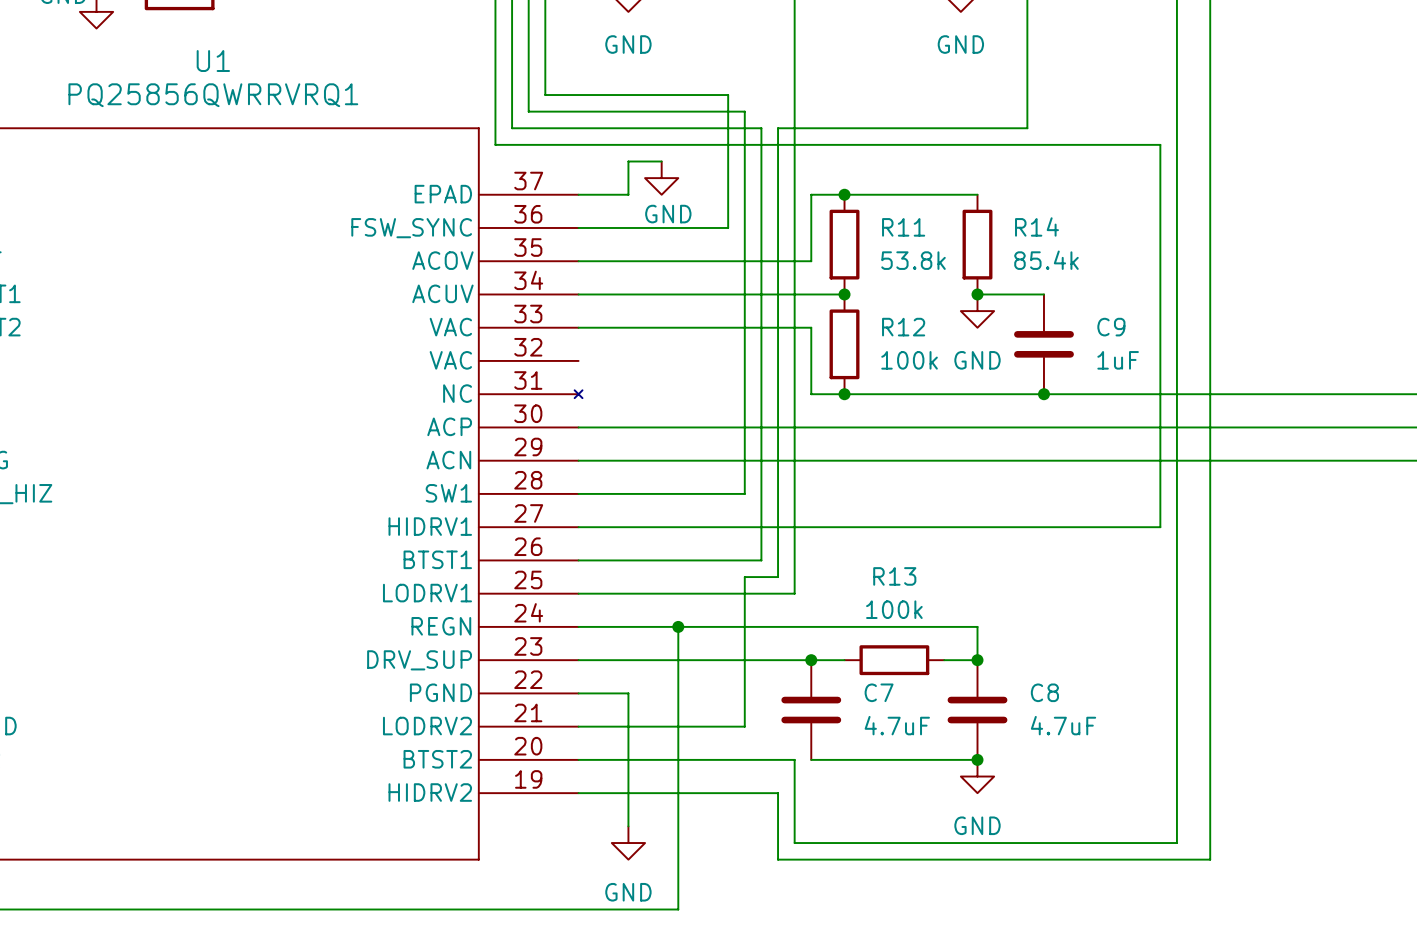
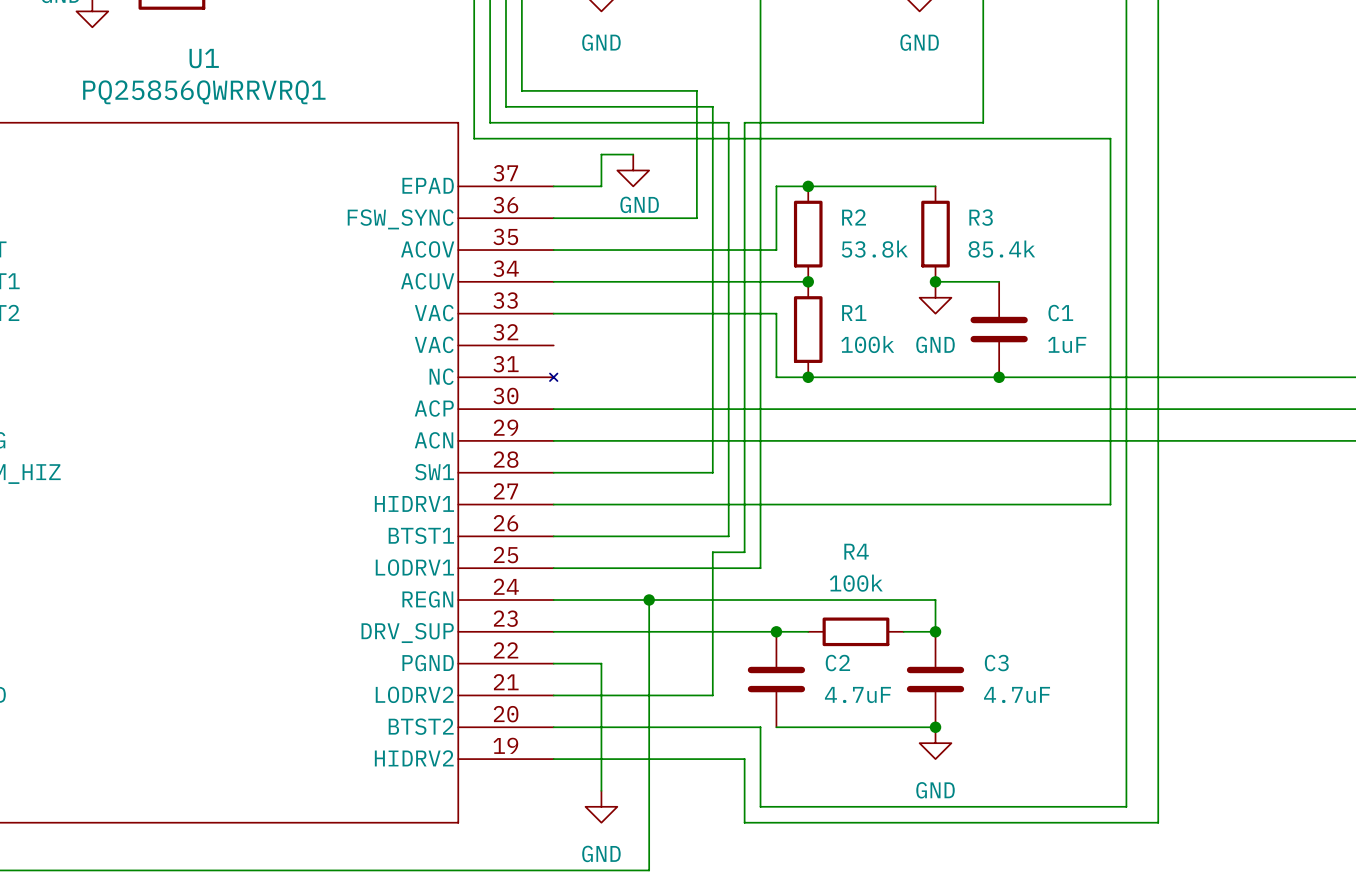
R14 name: R14 (1036, 226) -> R3 (981, 217)
R11 name: R11 (903, 227) -> R2 (854, 217)
R12 name: R12 (903, 327) -> R1 (854, 313)
C9 name: C9 (1111, 327) -> C1 (1060, 313)
R13 name: R13 (894, 576) -> R4 (856, 551)
C7 name: C7 (879, 692) -> C2 (837, 663)
C8 name: C8 (1044, 692) -> C3 (996, 663)

